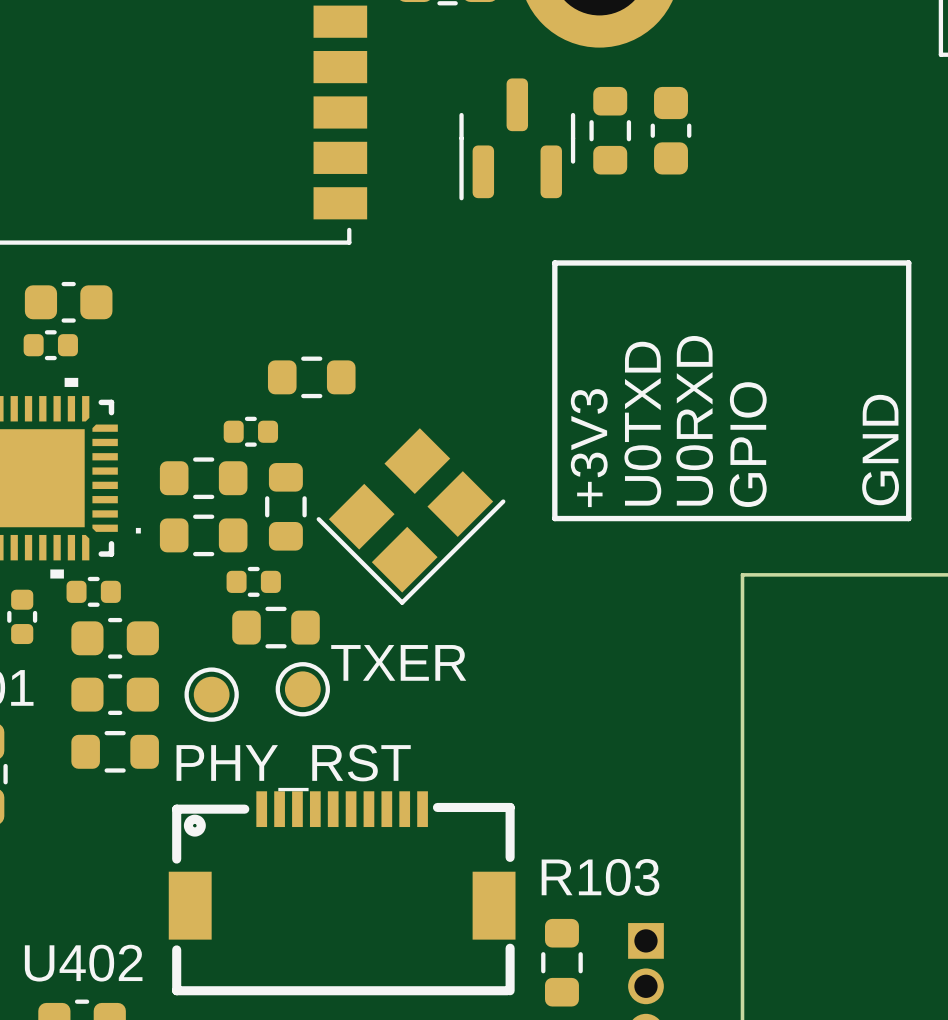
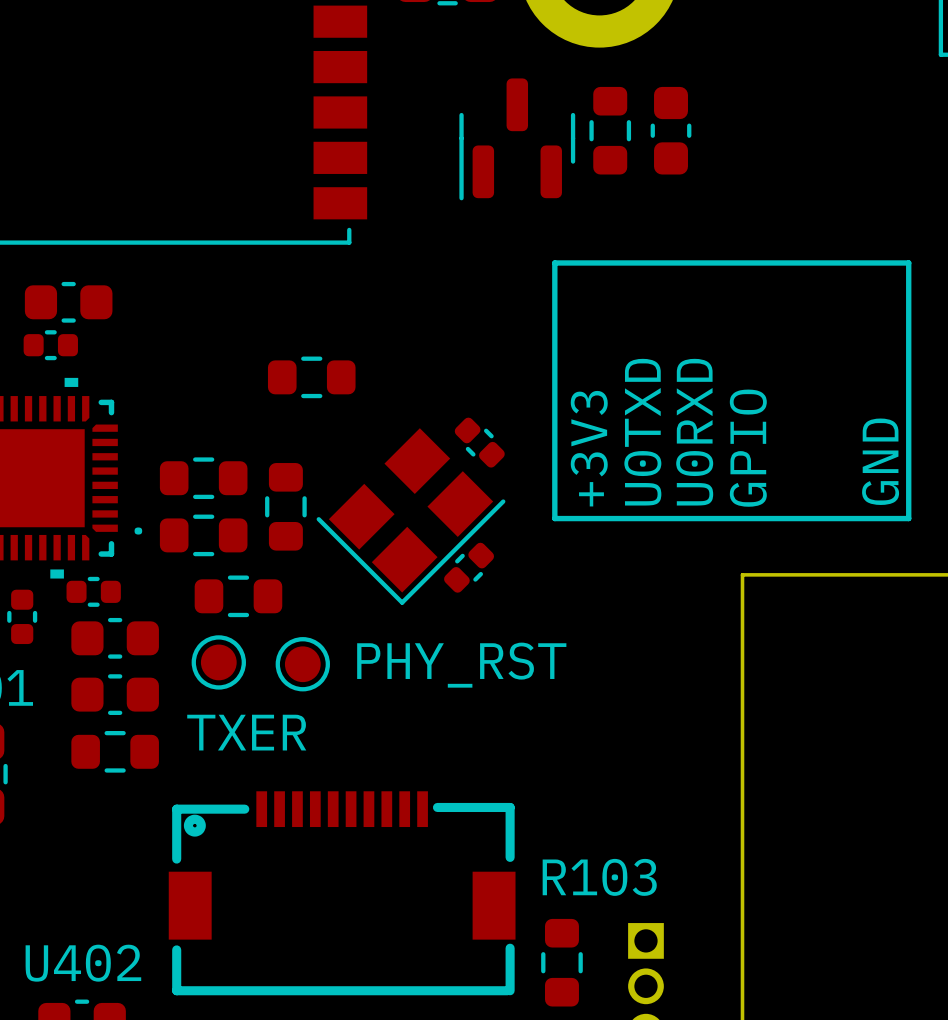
part: (250, 431) -> none
part: none -> (479, 442)
part footprint: [226, 566, 281, 597] -> [194, 575, 283, 618]
part: none -> (469, 567)
part: (276, 627) -> none
part: none -> (302, 664)
part: TXER (302, 689) -> none
part position: (211, 694) -> (218, 662)
part value: none -> TXER (246, 732)
text position: PHY_RST (293, 767) -> PHY_RST (461, 665)

